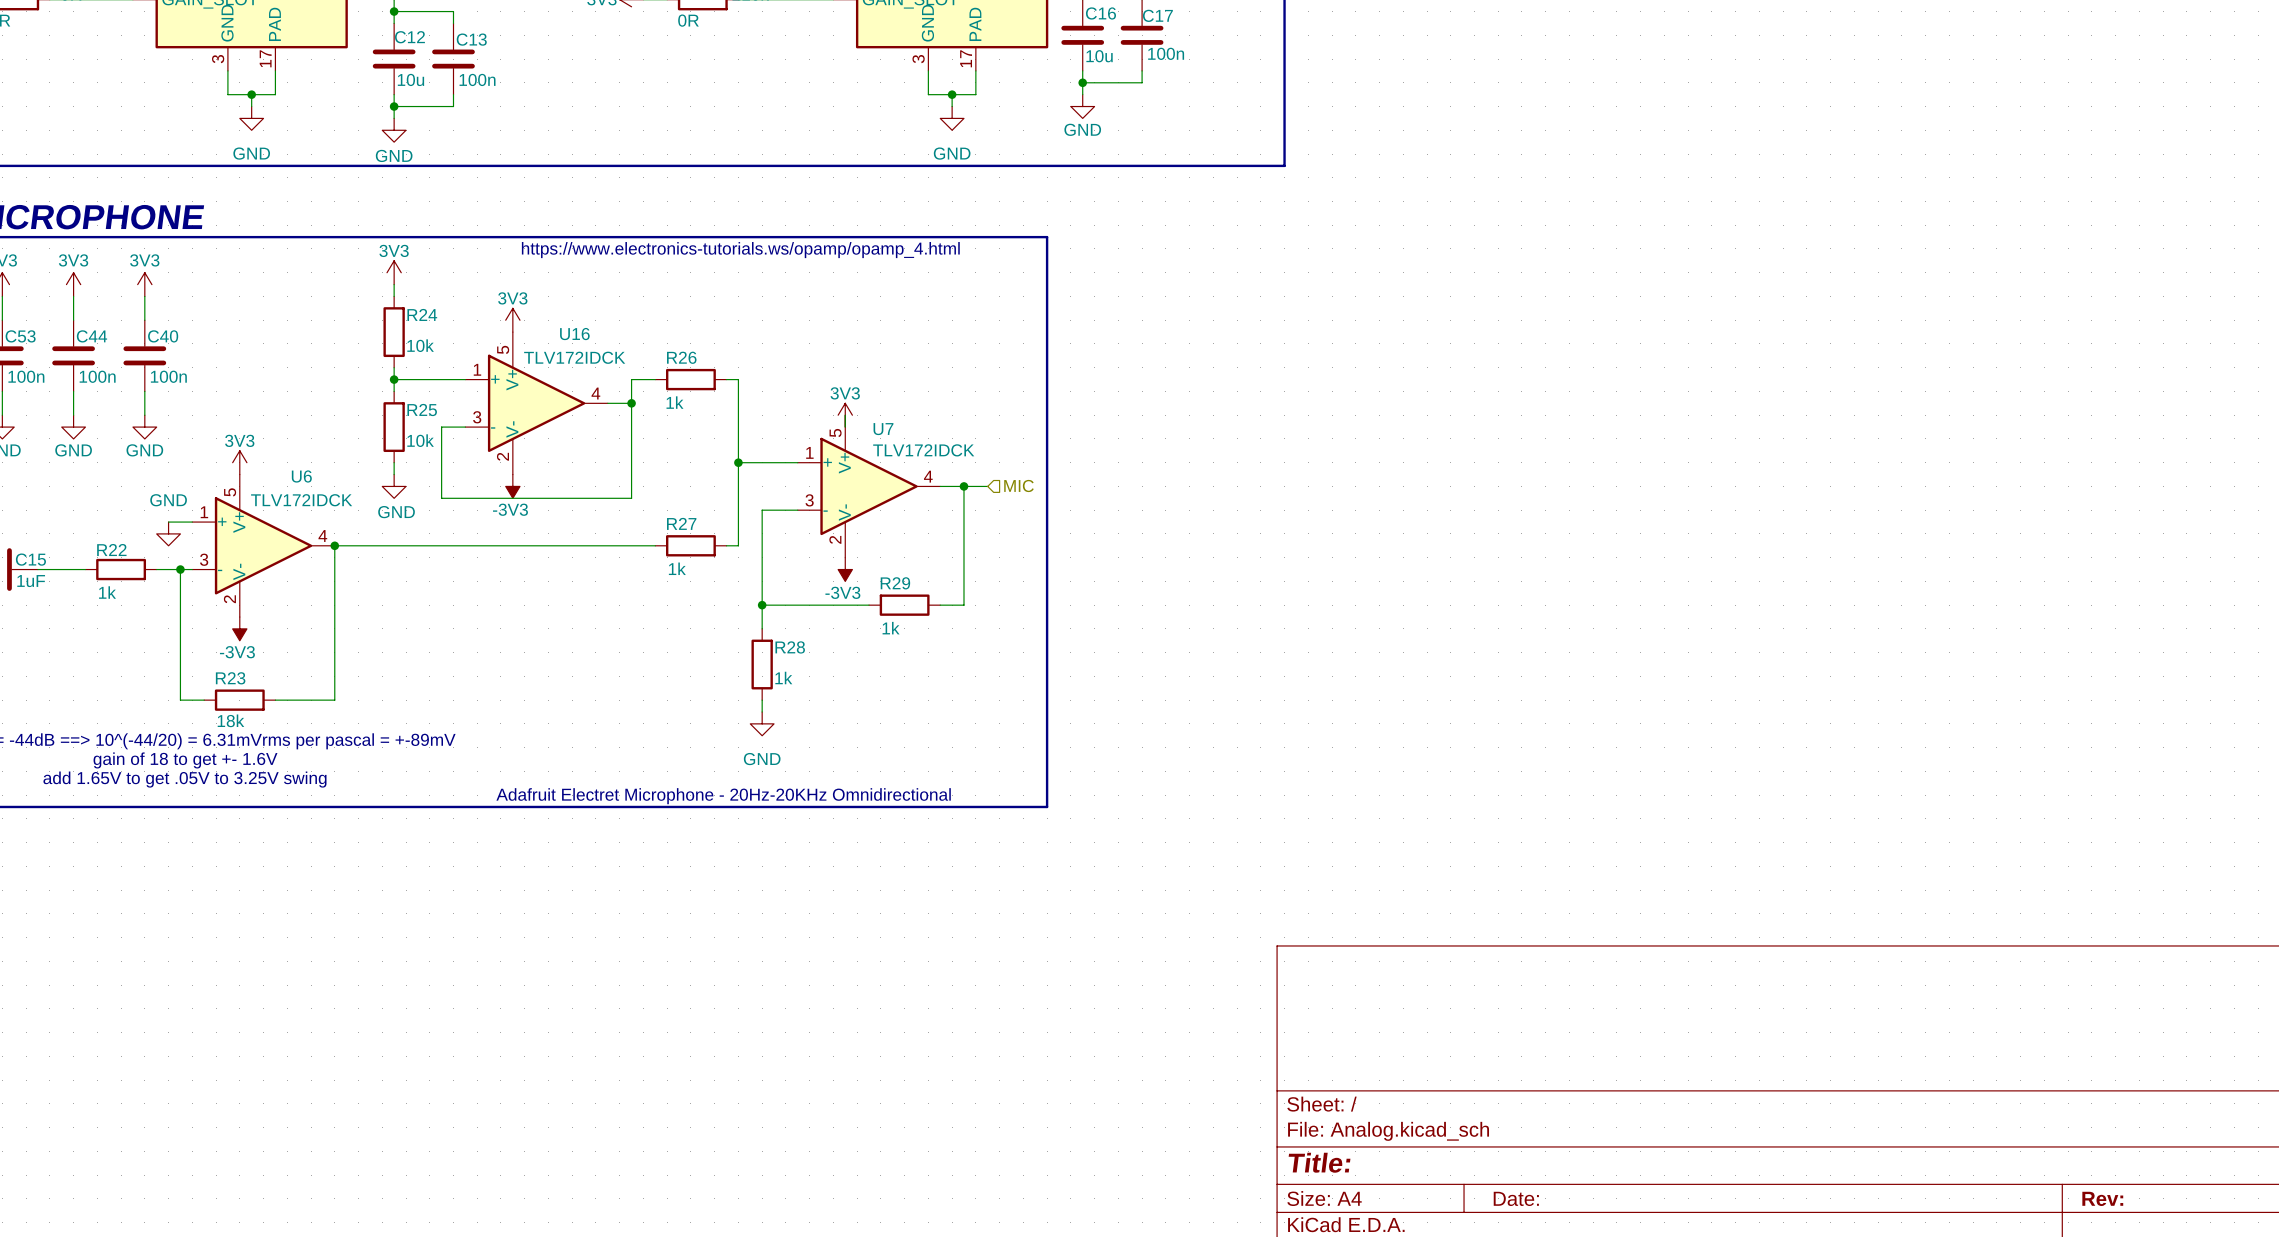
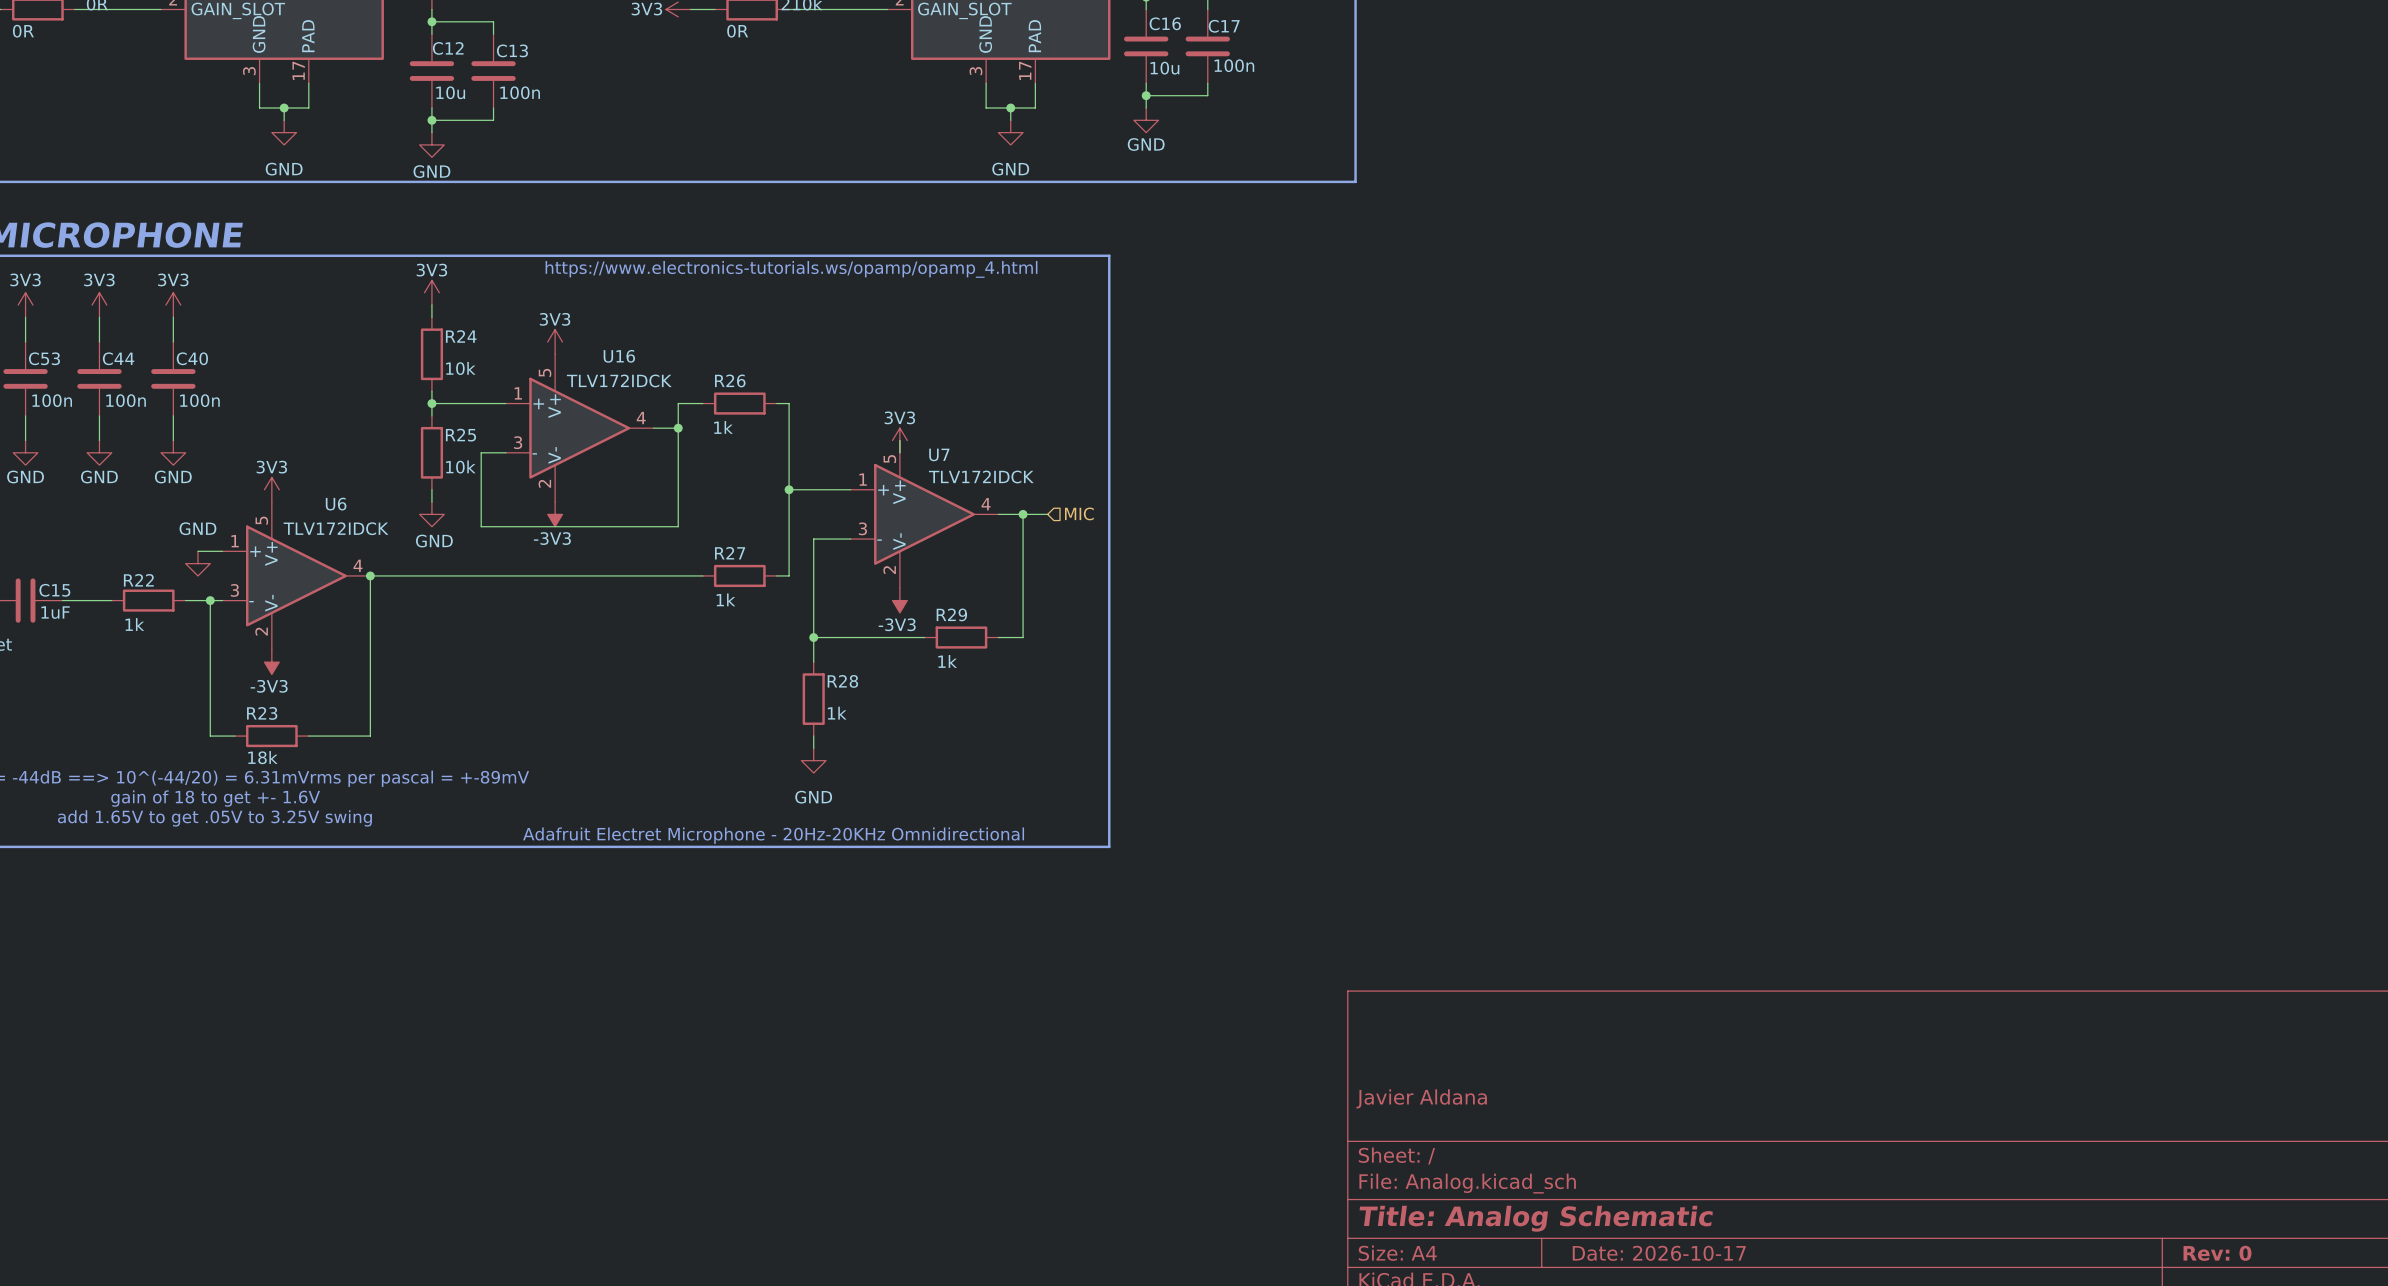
title block: none -> Javier Aldana (1421, 1098)
title block: Title: (1319, 1162) -> Title: Analog Schematic (1536, 1218)
title block: Date: (1516, 1198) -> Date: 2026-10-17 (1659, 1253)
title block: Rev: (2102, 1198) -> Rev: 0 (2217, 1253)

